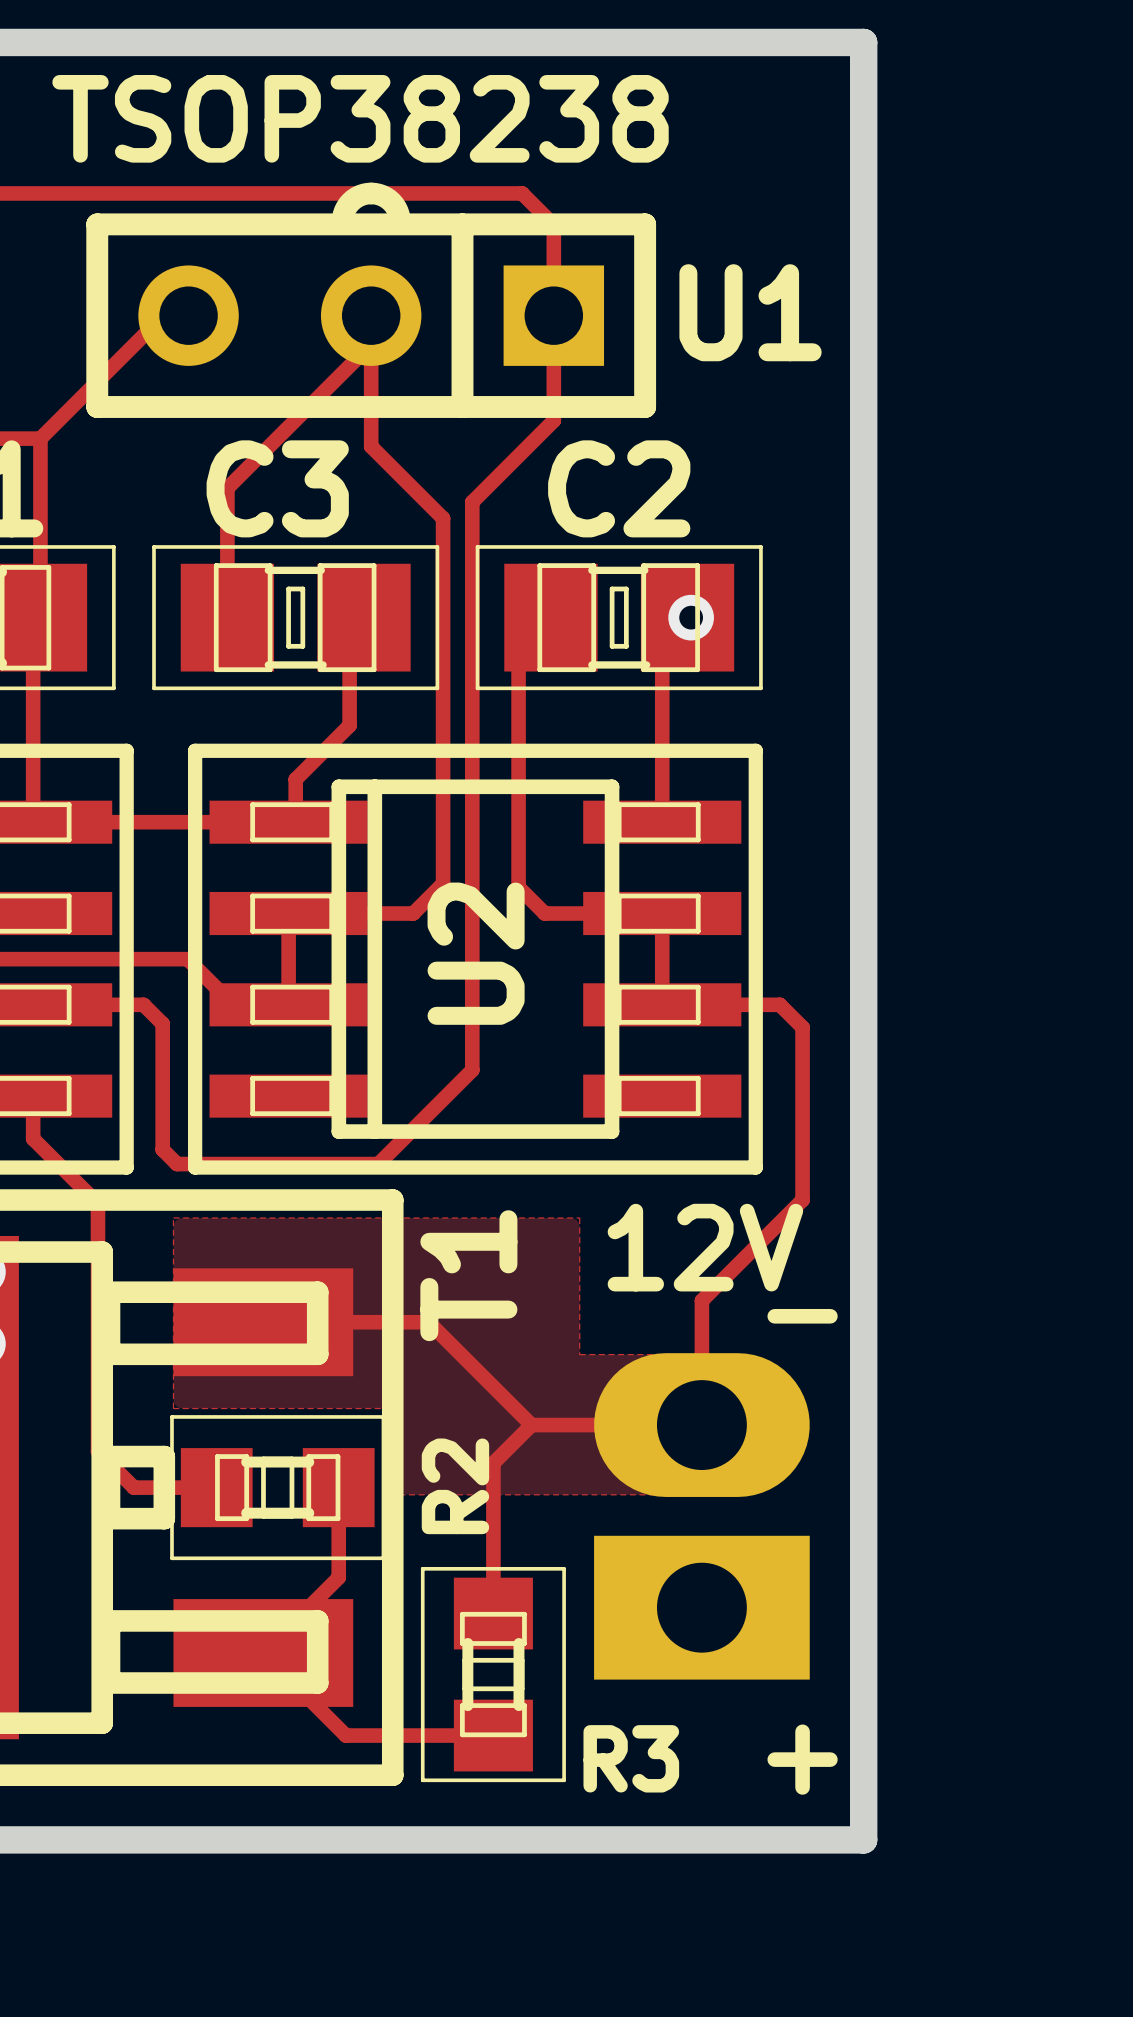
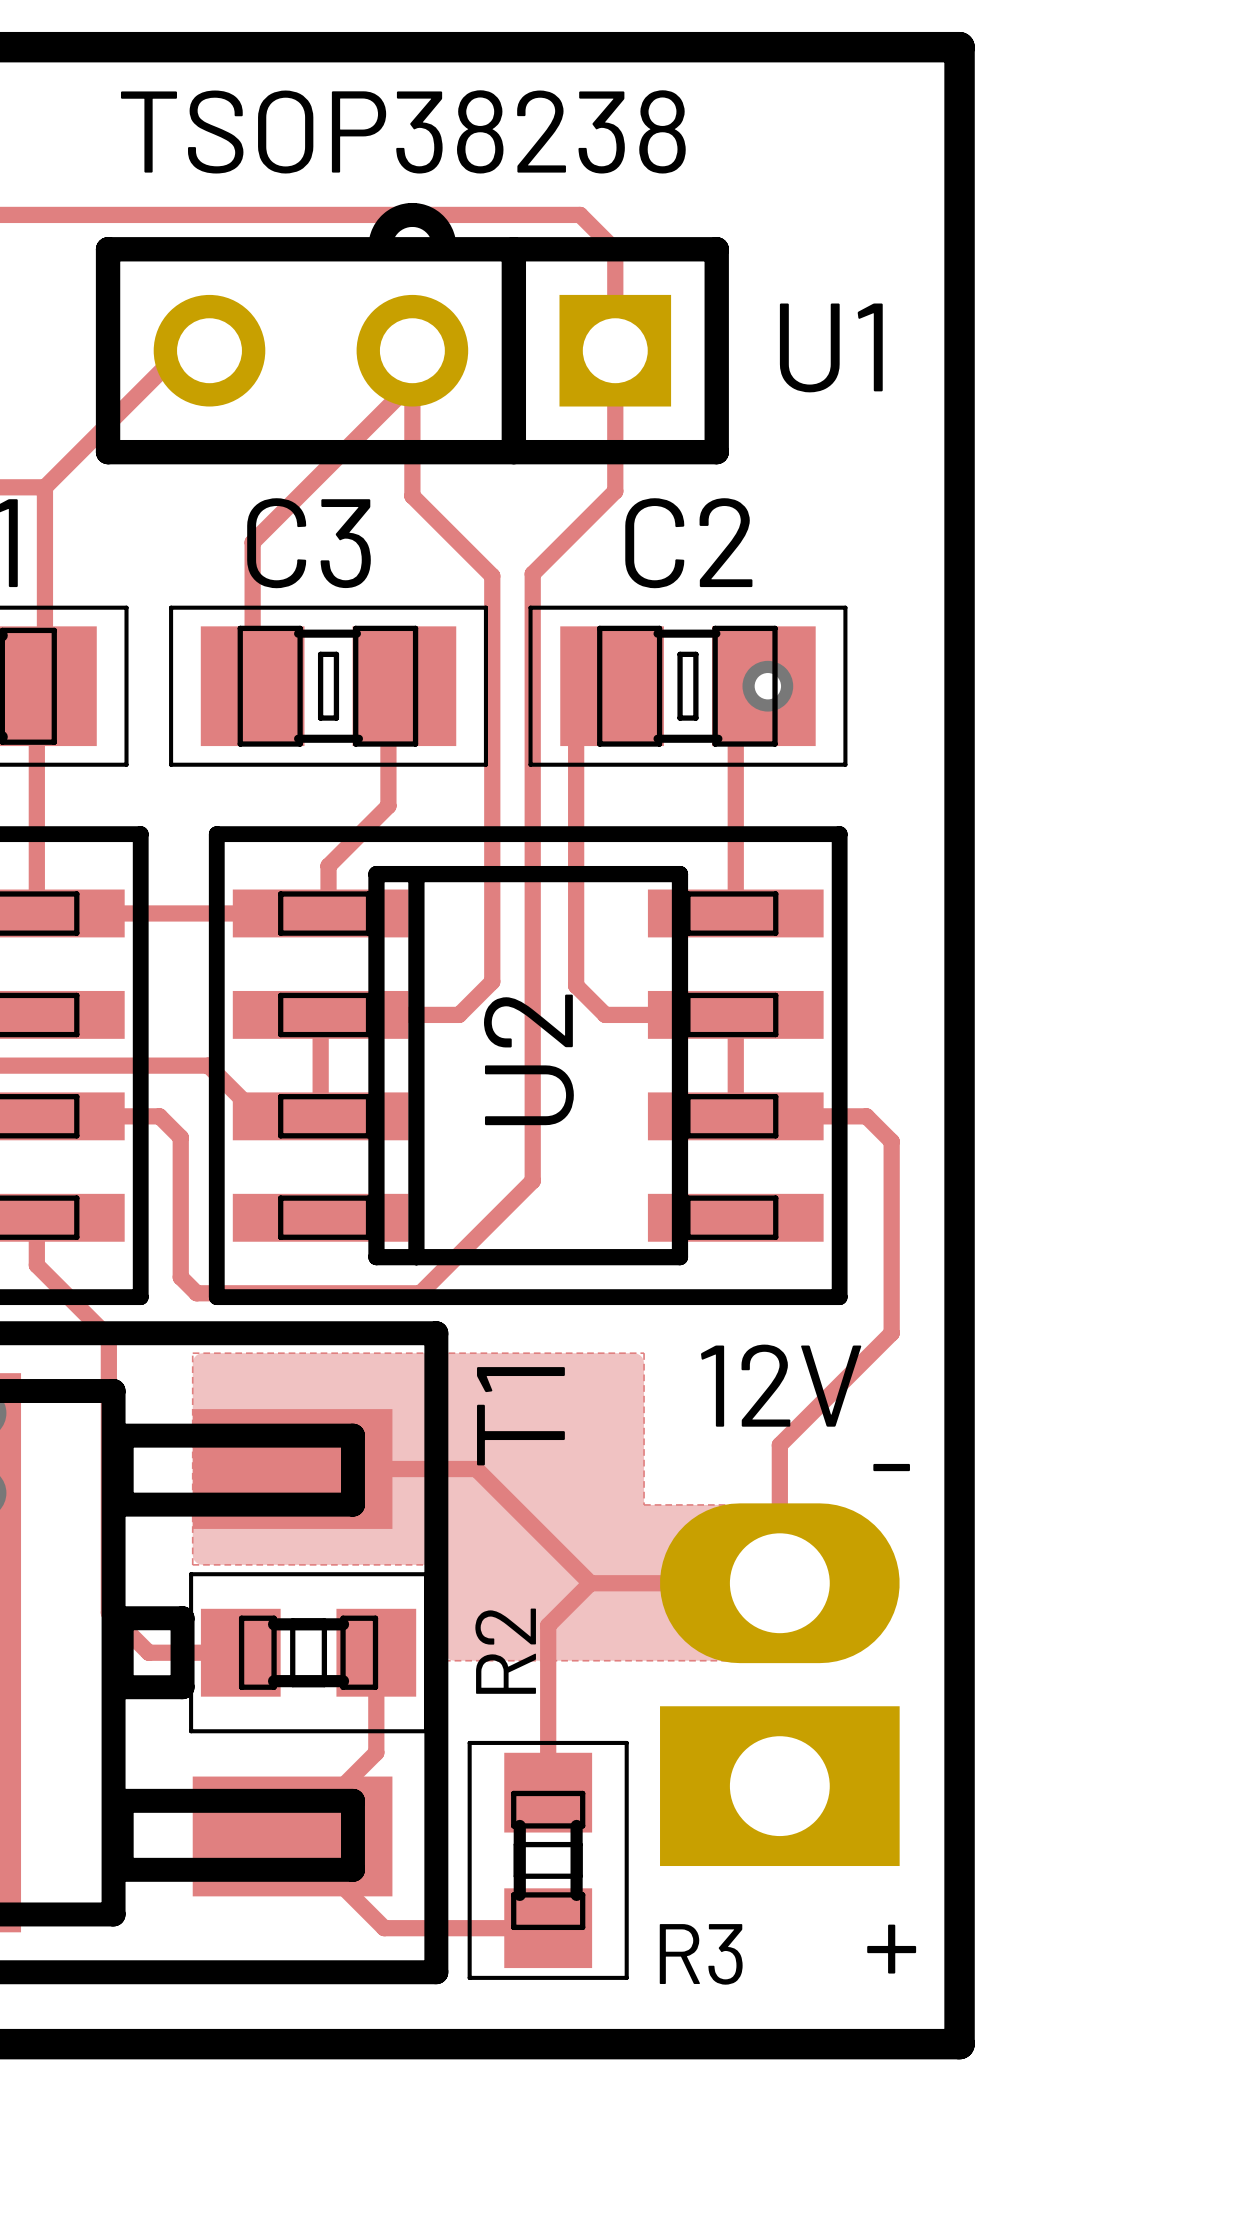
track: (553, 420) (472, 502) (472, 1070) -> (615, 467) (615, 491) (532, 573) (532, 1180) (524, 1188)

